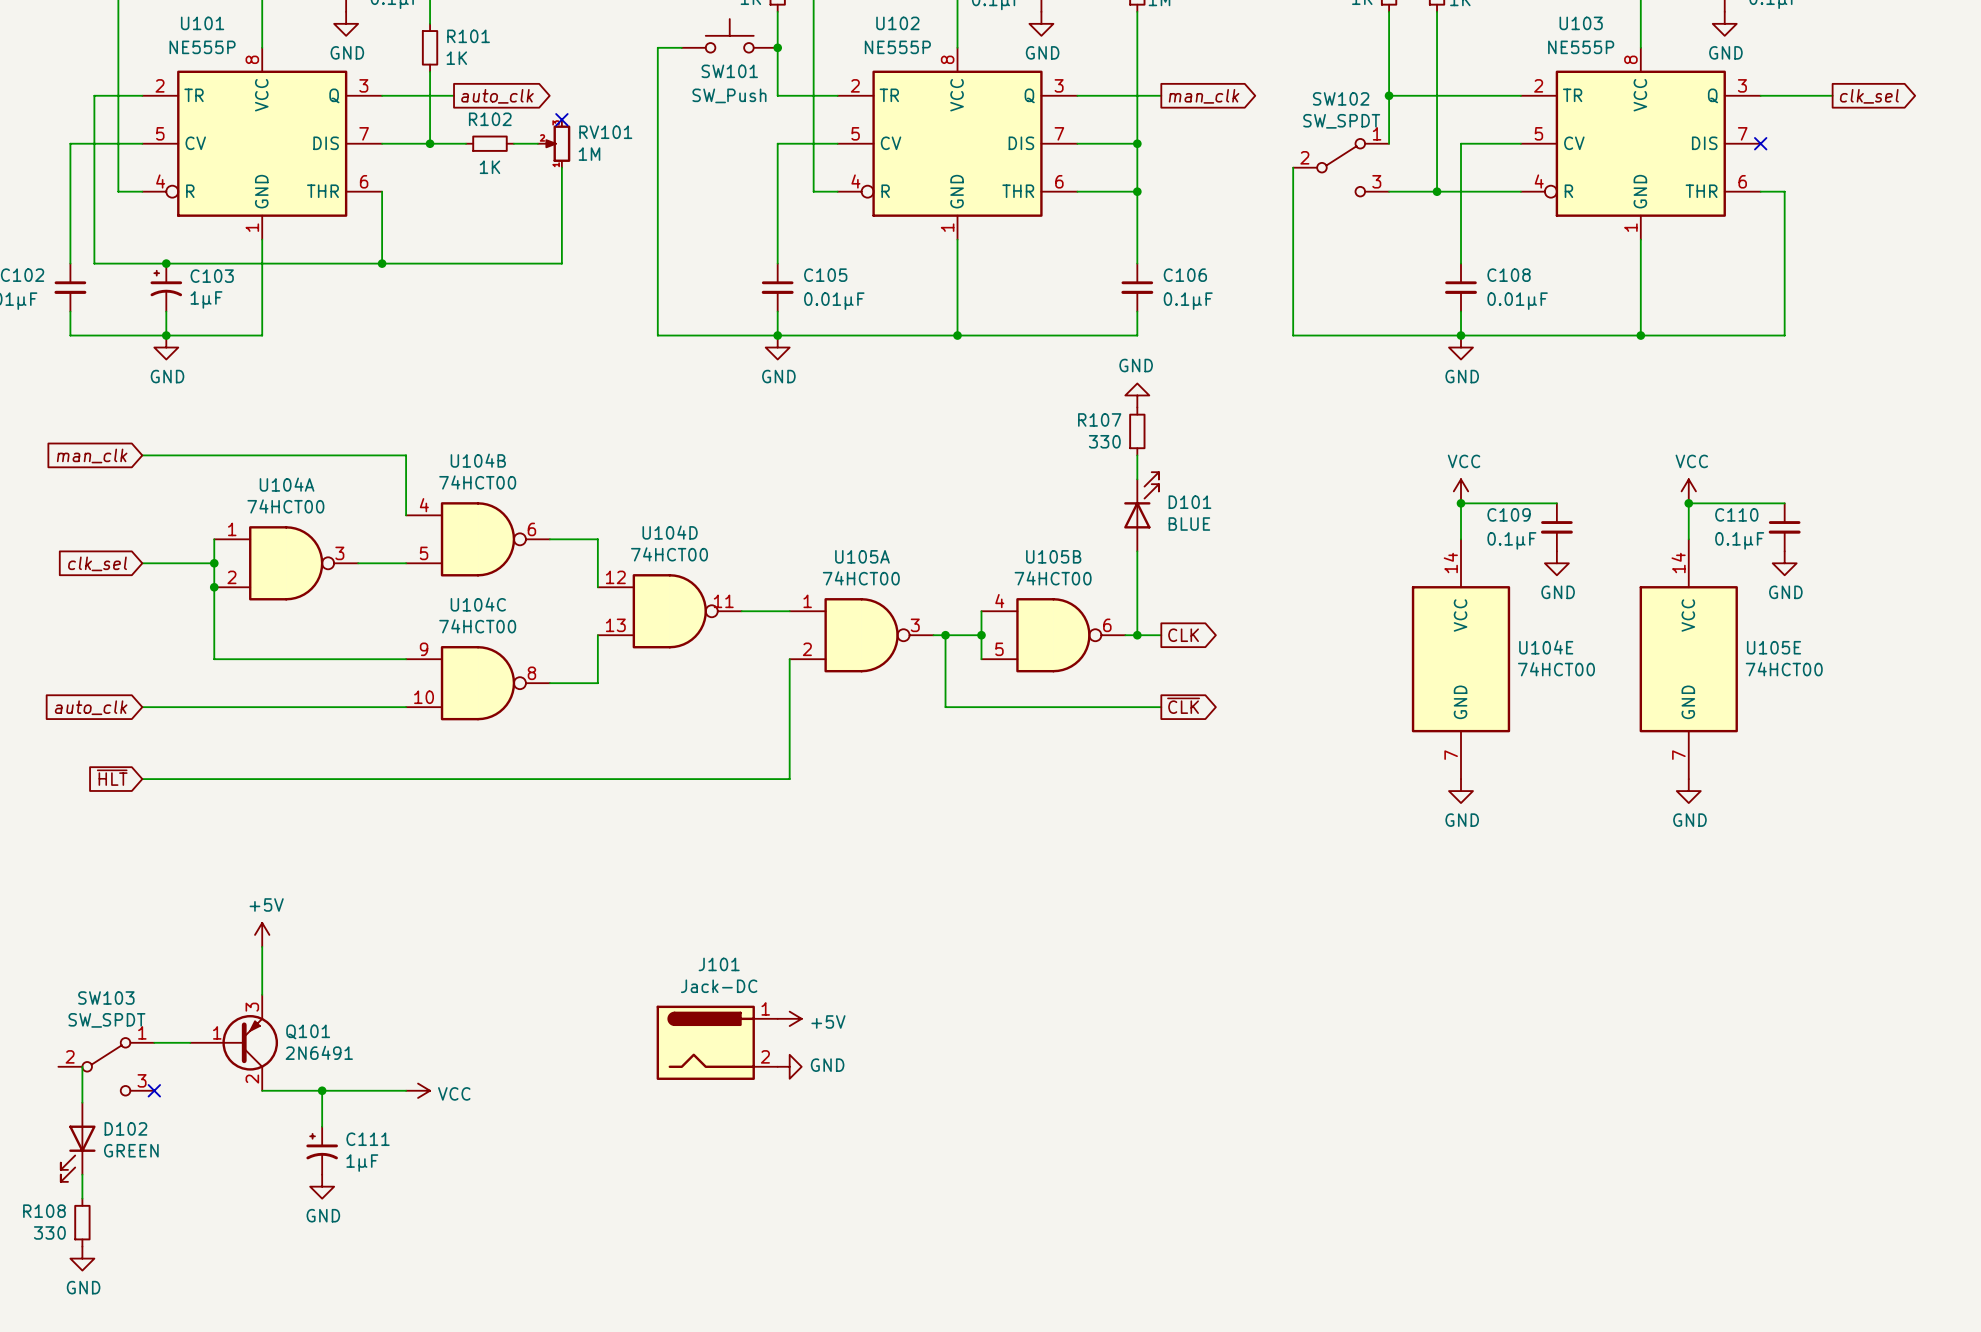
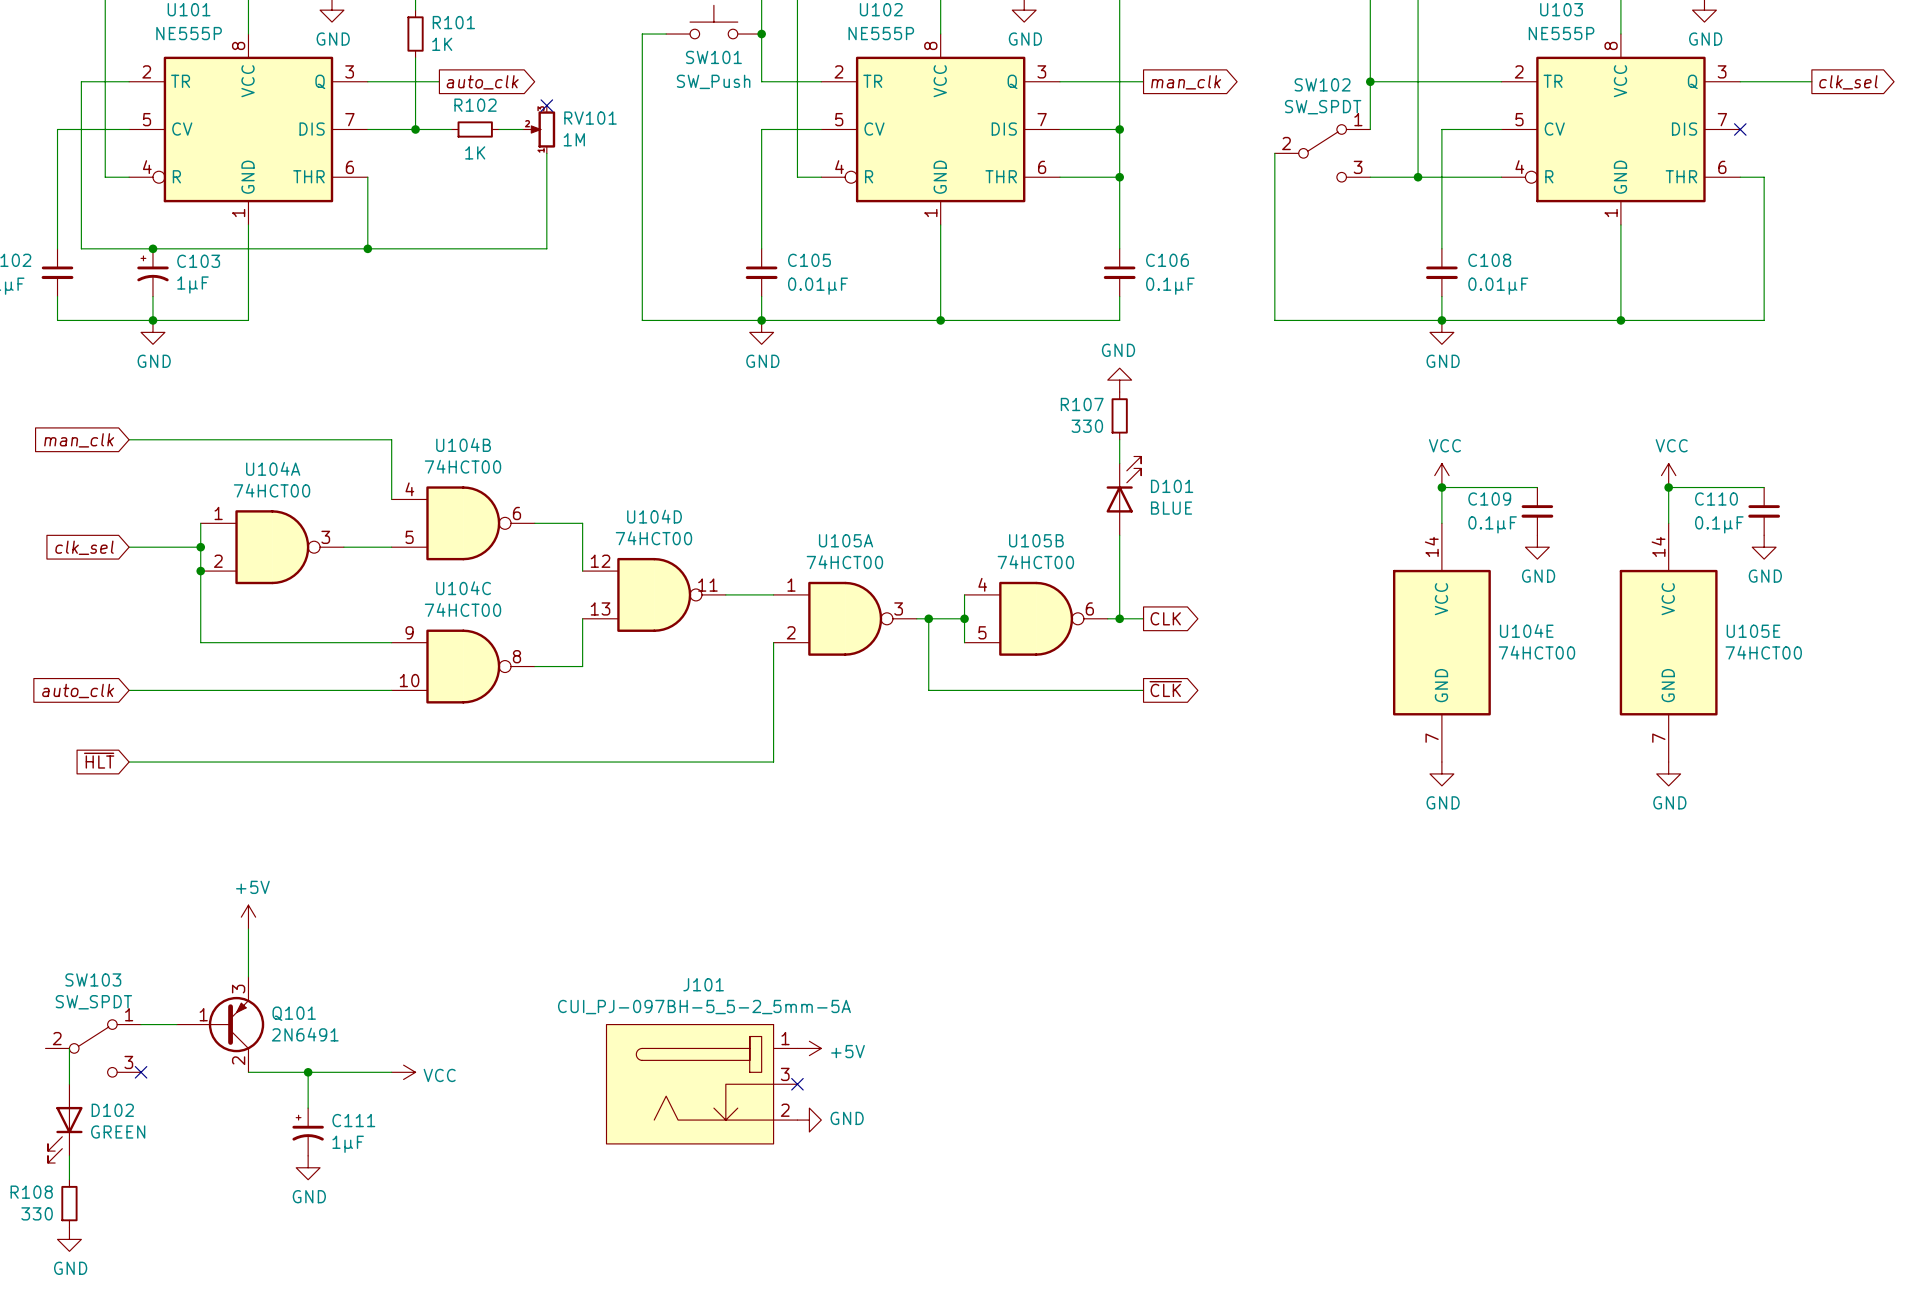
J101 name position: J101 (719, 964) -> J101 (703, 984)
J101 value: Jack-DC (719, 986) -> CUI_PJ-097BH-5_5-2_5mm-5A (704, 1007)
J101 symbol: [656, 1005, 778, 1080] -> [606, 1024, 798, 1144]
power symbol position: +5V (789, 1018) -> +5V (809, 1048)
power symbol position: GND (789, 1066) -> GND (809, 1120)
no-connect mark: none -> (797, 1084)

